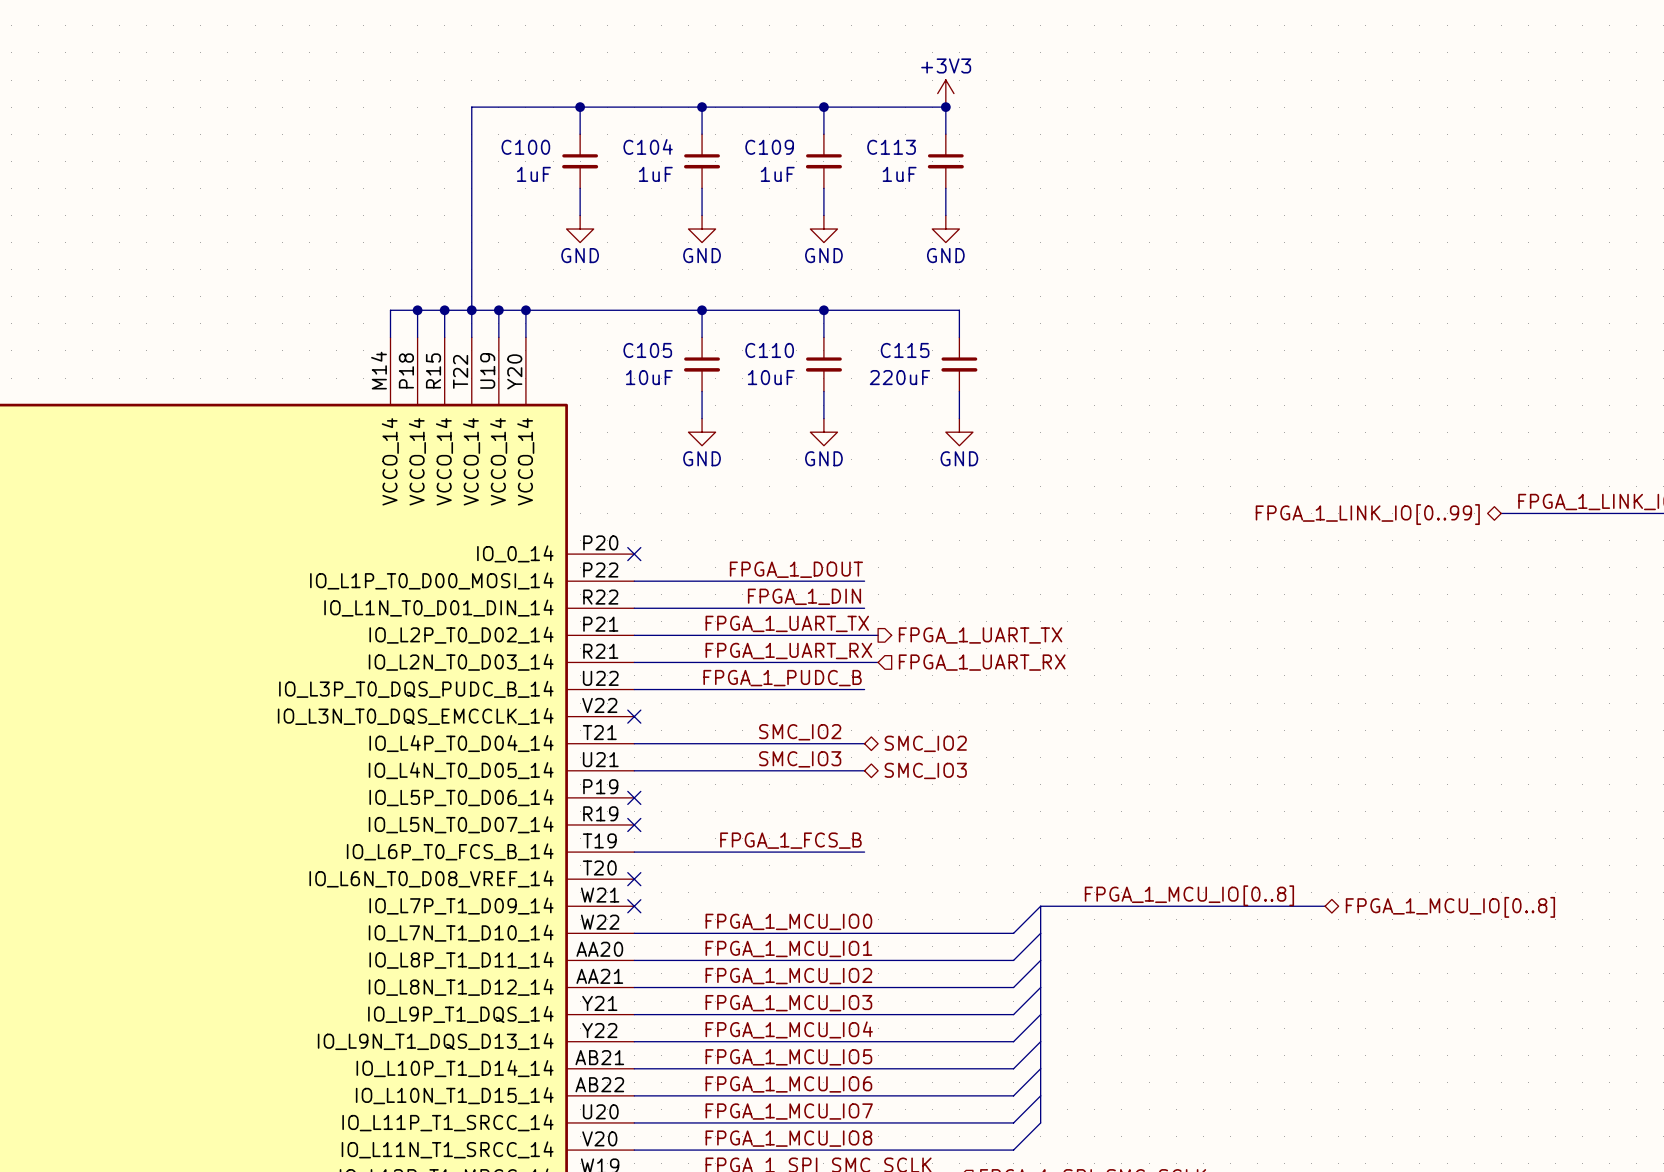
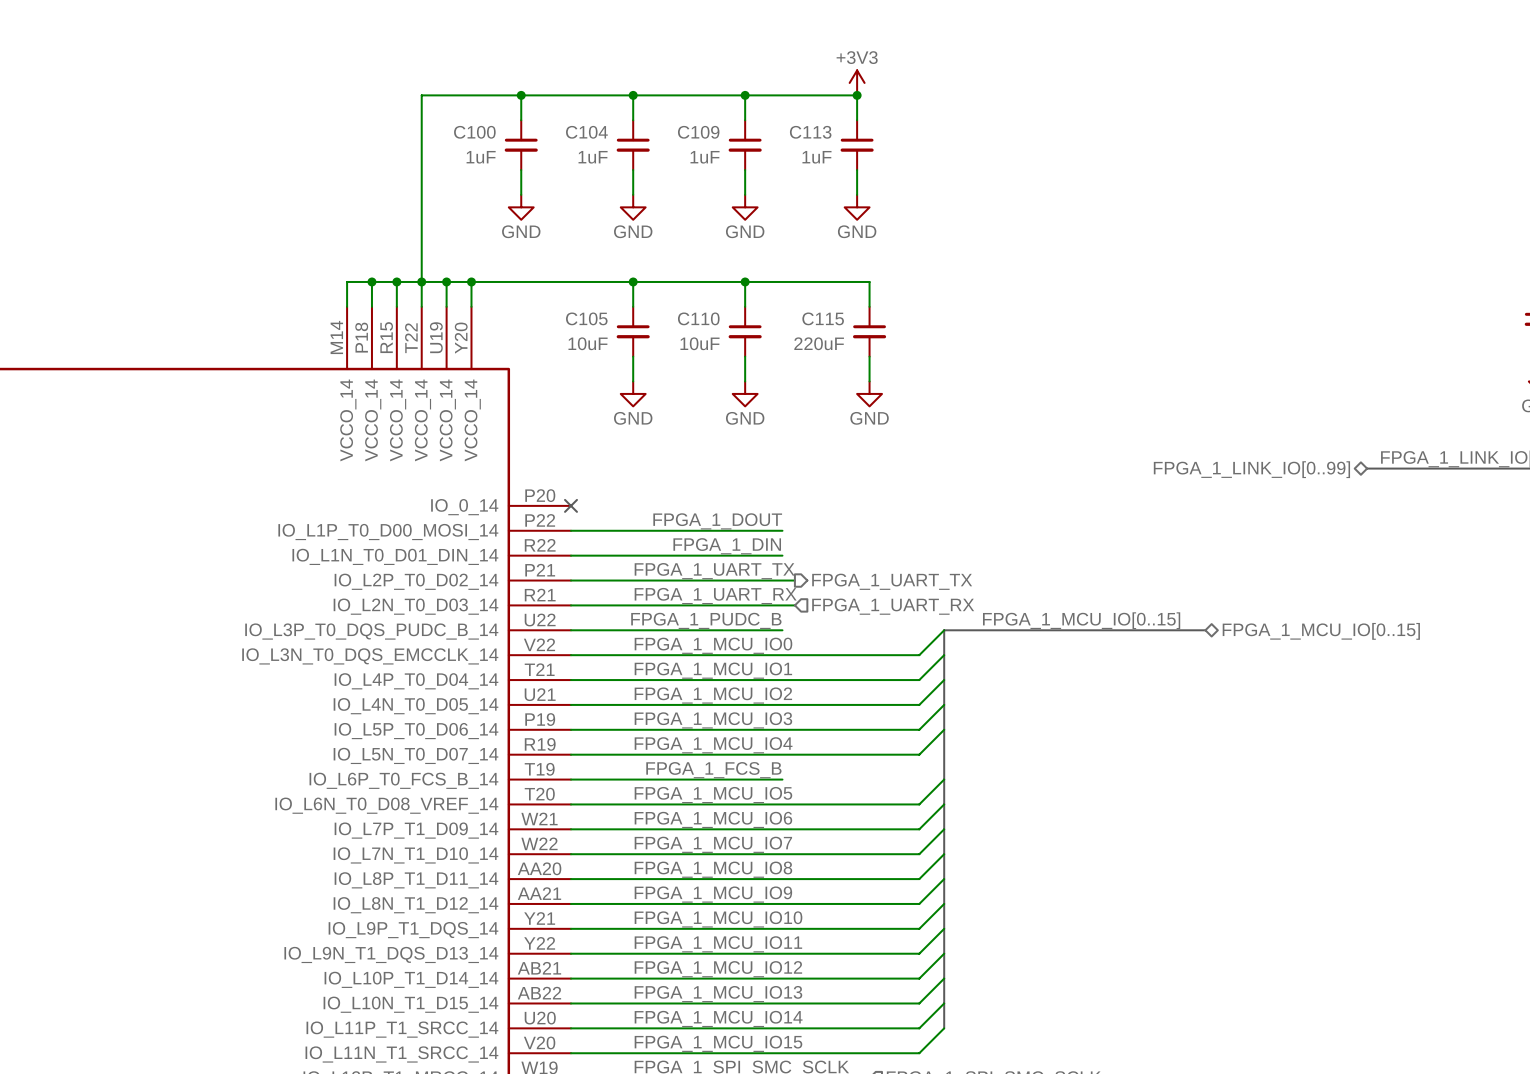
label: none -> FPGA_1_MCU_IO[0..15] (1081, 620)
wire: none -> (944, 630) (919, 655) (571, 655)
hierarchical label: none -> FPGA_1_MCU_IO[0..15] (1321, 631)
label: none -> FPGA_1_MCU_IO0 (713, 645)
no-connect mark: (634, 716) -> none
wire: none -> (944, 655) (919, 680) (782, 680)
label: none -> FPGA_1_MCU_IO1 (713, 670)
label: SMC_IO2 (800, 732) -> none
hierarchical label: SMC_IO2 (925, 743) -> none
wire: none -> (944, 680) (919, 704) (782, 704)
label: none -> FPGA_1_MCU_IO2 (713, 695)
label: SMC_IO3 (800, 759) -> none
hierarchical label: SMC_IO3 (925, 770) -> none
wire: none -> (944, 704) (919, 729) (571, 729)
label: none -> FPGA_1_MCU_IO3 (713, 720)
no-connect mark: (634, 797) -> none
wire: none -> (944, 729) (919, 754) (571, 754)
label: none -> FPGA_1_MCU_IO4 (713, 745)
no-connect mark: (634, 824) -> none
wire: none -> (944, 779) (919, 804) (571, 804)
label: none -> FPGA_1_MCU_IO5 (713, 795)
no-connect mark: (634, 879) -> none
wire: none -> (944, 804) (919, 829) (571, 829)
label: none -> FPGA_1_MCU_IO6 (713, 819)
label: FPGA_1_MCU_IO[0..8] (1189, 895) -> none
no-connect mark: (634, 906) -> none
bus: (1040, 906) (1325, 906) -> (944, 829) (944, 630) (1205, 630)
hierarchical label: FPGA_1_MCU_IO[0..8] (1450, 907) -> none
label: FPGA_1_MCU_IO0 (788, 921) -> FPGA_1_MCU_IO7 (713, 844)
label: FPGA_1_MCU_IO1 (788, 948) -> FPGA_1_MCU_IO8 (713, 869)
label: FPGA_1_MCU_IO2 (788, 976) -> FPGA_1_MCU_IO9 (713, 894)
label: FPGA_1_MCU_IO3 (788, 1003) -> FPGA_1_MCU_IO10 (718, 919)
label: FPGA_1_MCU_IO4 (789, 1029) -> FPGA_1_MCU_IO11 (718, 944)
label: FPGA_1_MCU_IO5 (788, 1057) -> FPGA_1_MCU_IO12 (718, 969)
label: FPGA_1_MCU_IO6 (788, 1084) -> FPGA_1_MCU_IO13 (718, 994)
label: FPGA_1_MCU_IO7 (789, 1111) -> FPGA_1_MCU_IO14 (718, 1018)
label: FPGA_1_MCU_IO8 (788, 1138) -> FPGA_1_MCU_IO15 (718, 1043)

